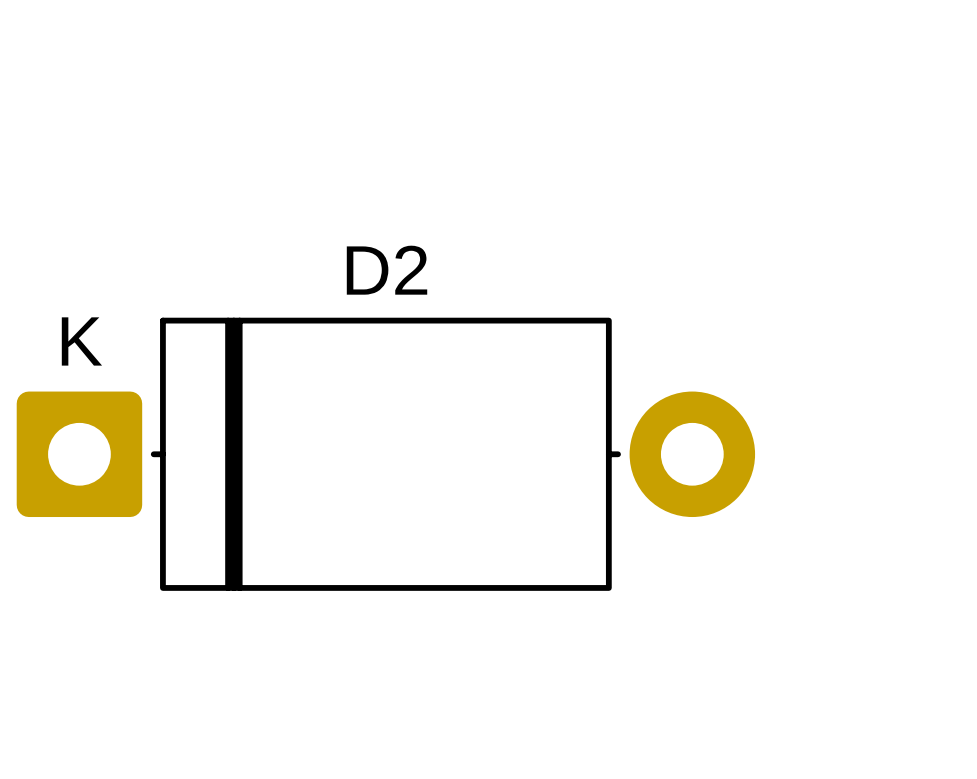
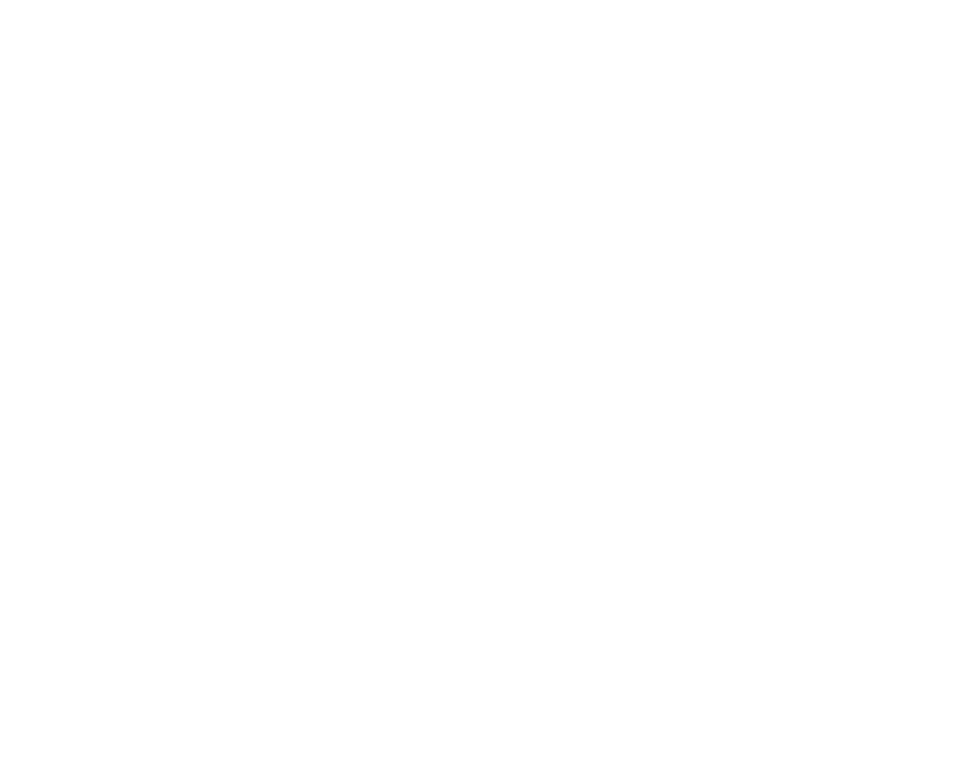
D2: (385, 454) -> none

